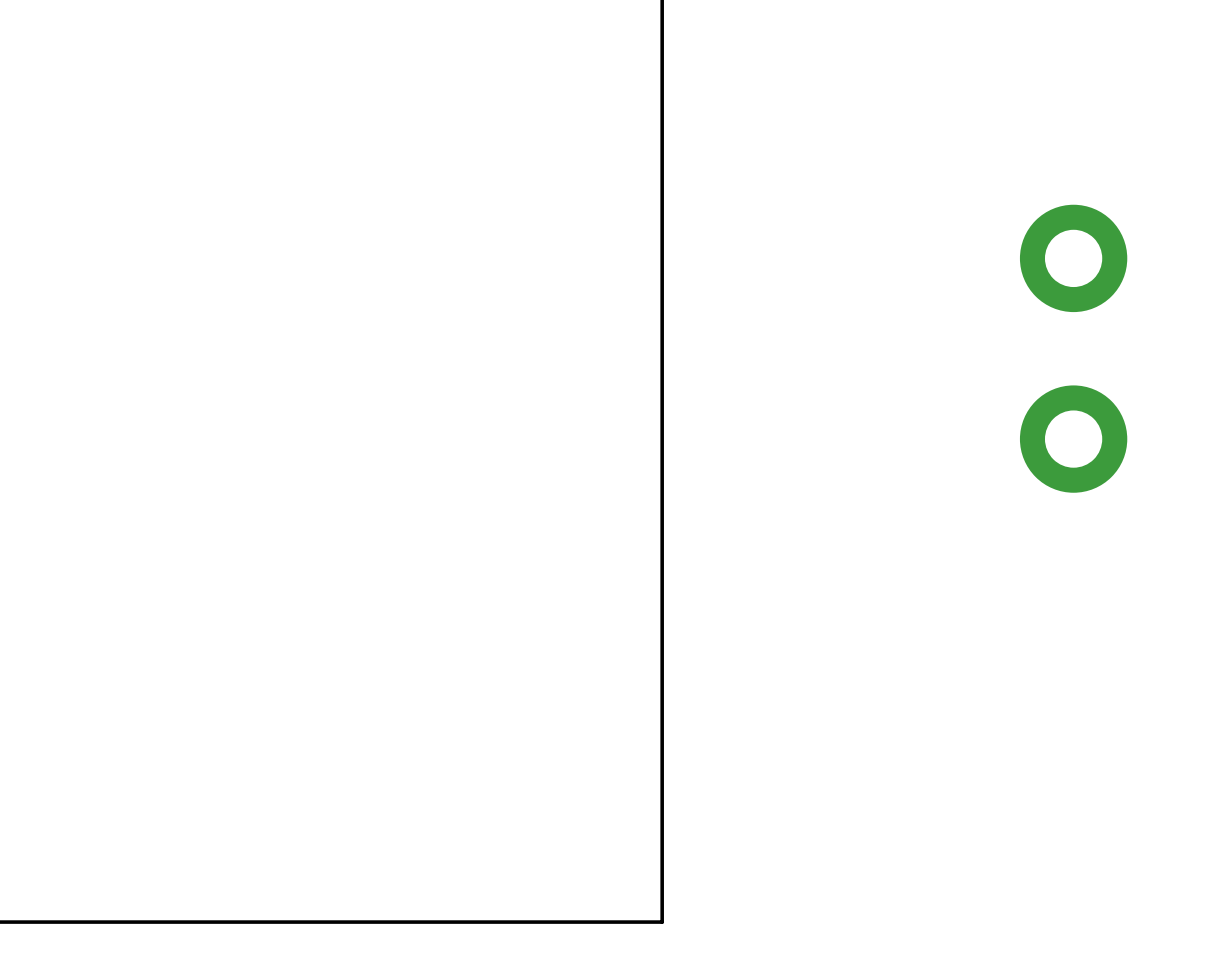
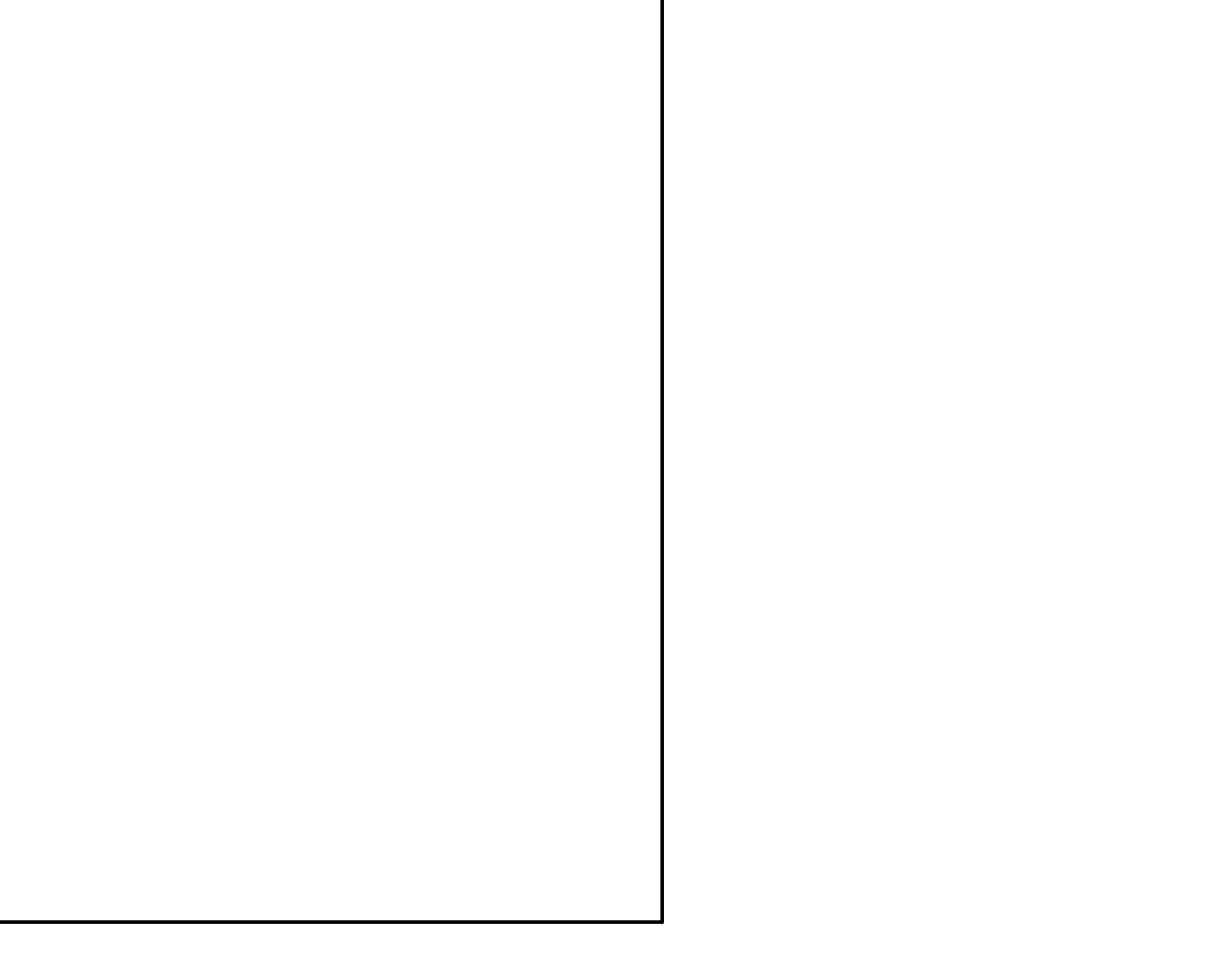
part: (1073, 258) -> none
part: (1073, 439) -> none

